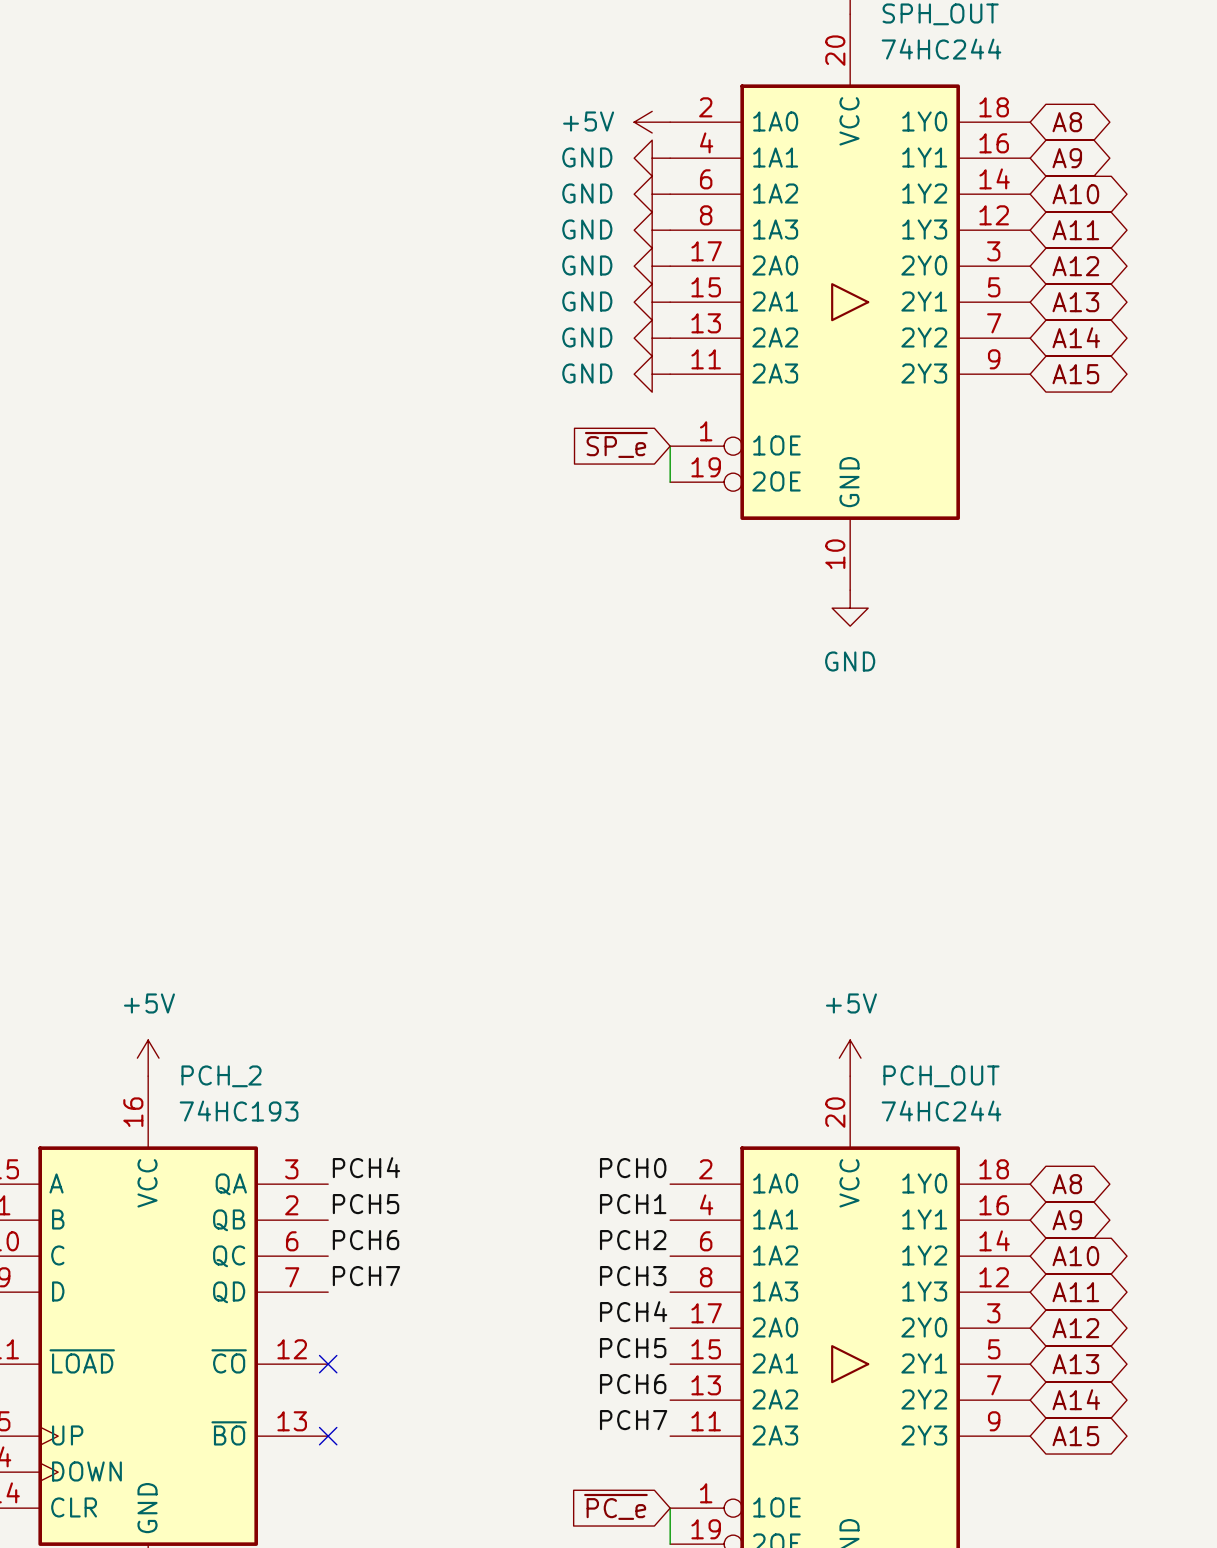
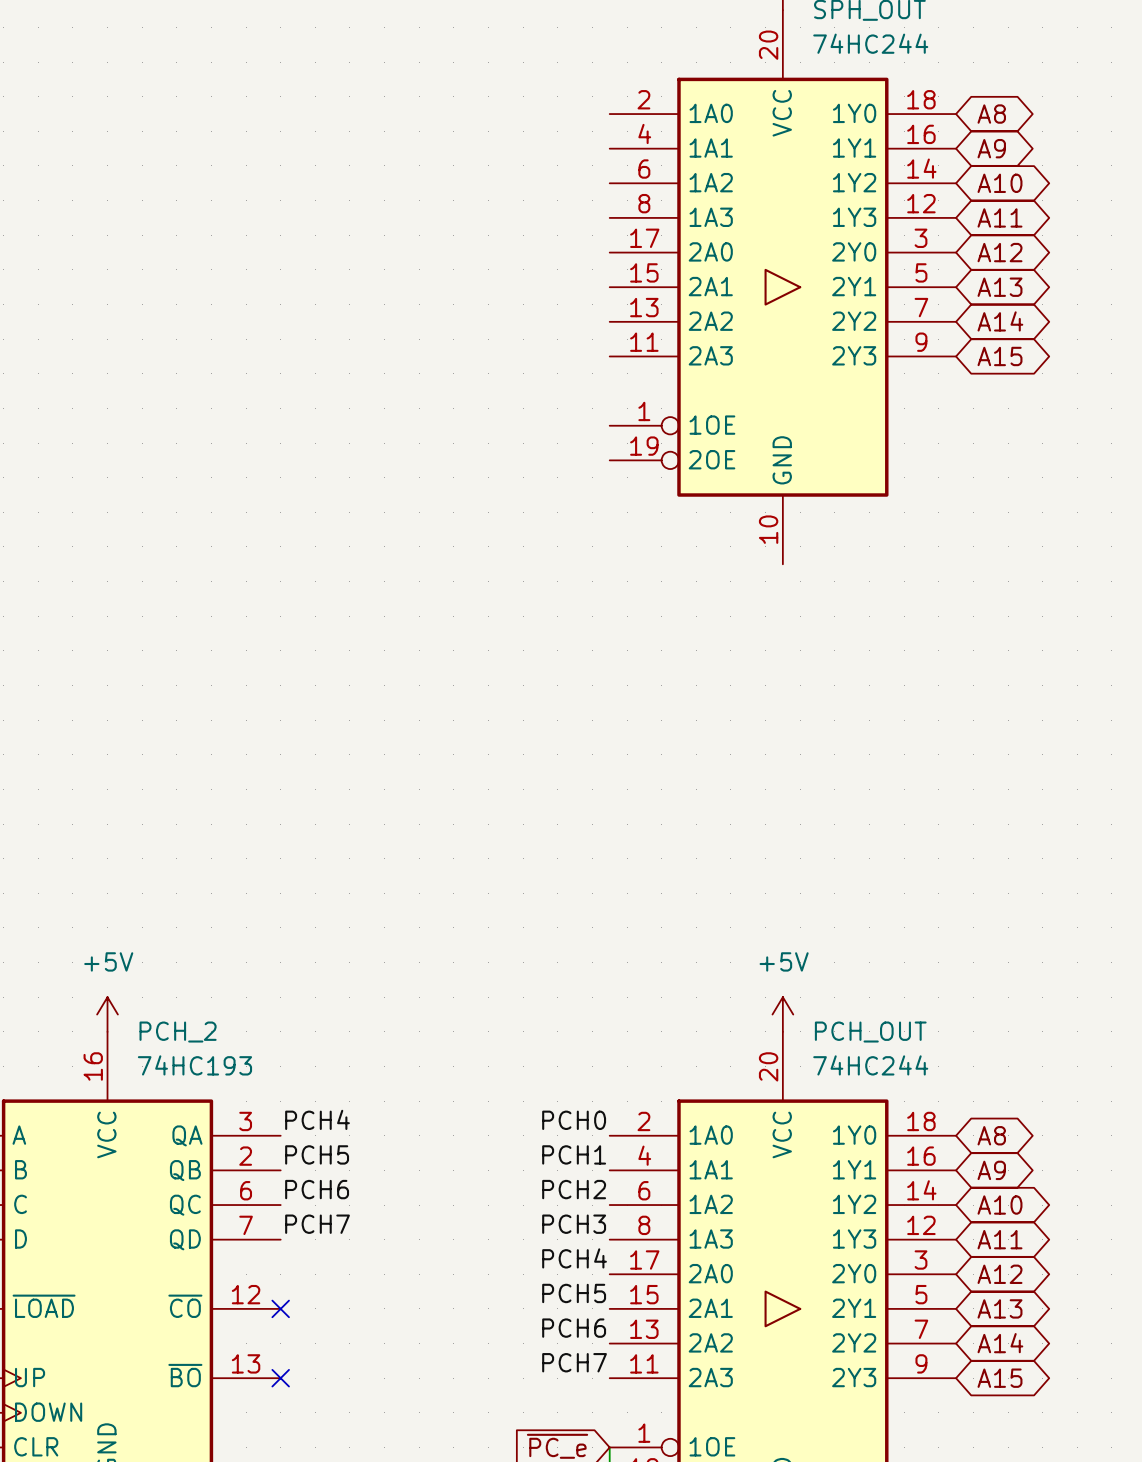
power symbol: +5V (652, 122) -> none
power symbol: GND (652, 158) -> none
power symbol: GND (652, 194) -> none
power symbol: GND (652, 230) -> none
power symbol: GND (652, 266) -> none
power symbol: GND (652, 302) -> none
power symbol: GND (652, 338) -> none
power symbol: GND (652, 374) -> none
global label: ~{SP_e} (616, 444) -> none
wire: (670, 446) (670, 482) -> none
power symbol: GND (850, 608) -> none

